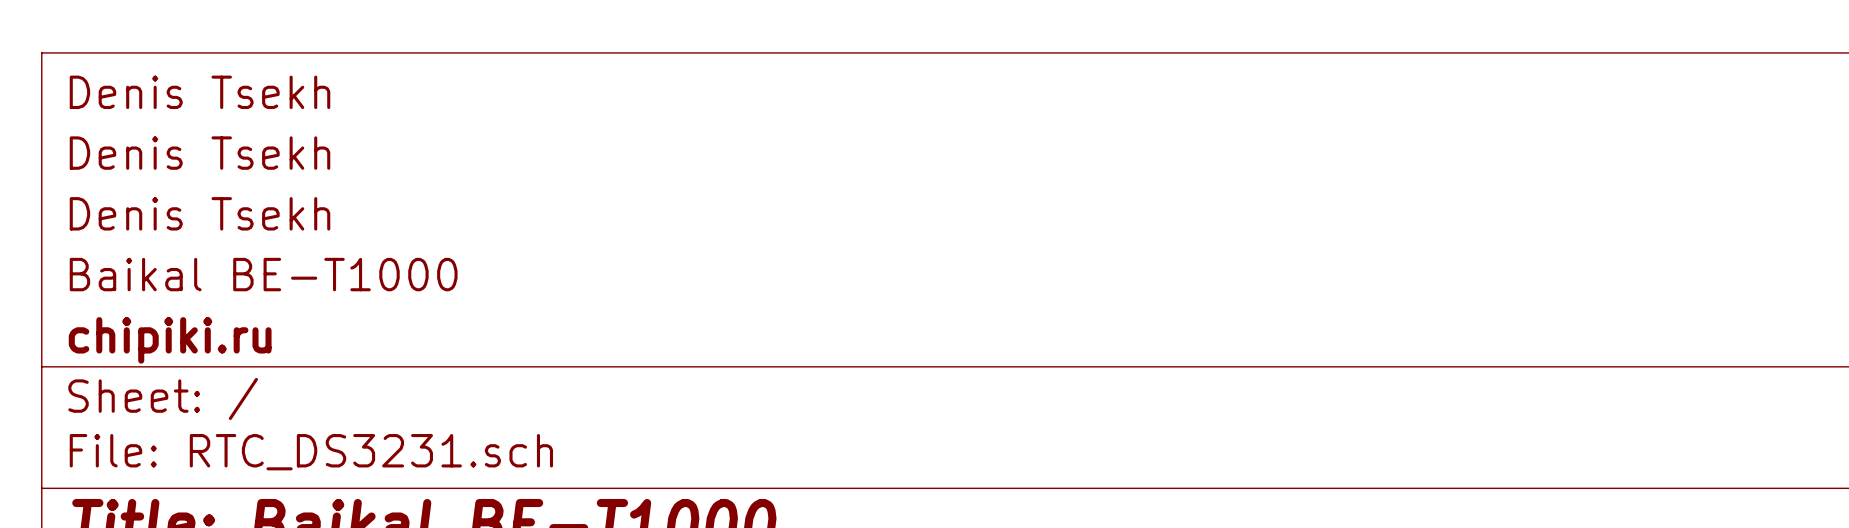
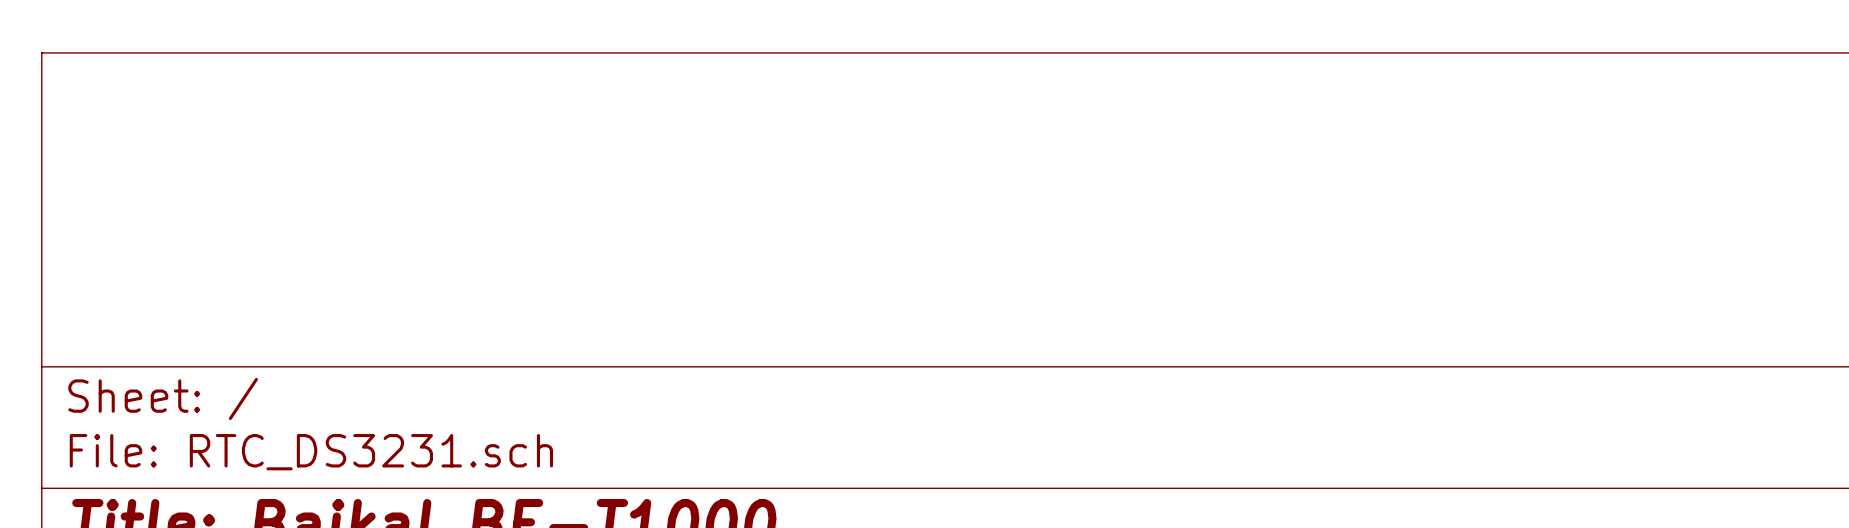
title block: Denis Tsekh (200, 92) -> none
title block: Denis Tsekh (200, 153) -> none
title block: Denis Tsekh (200, 213) -> none
title block: Baikal BE-T1000 (263, 274) -> none
title block: chipiki.ru (170, 340) -> none

